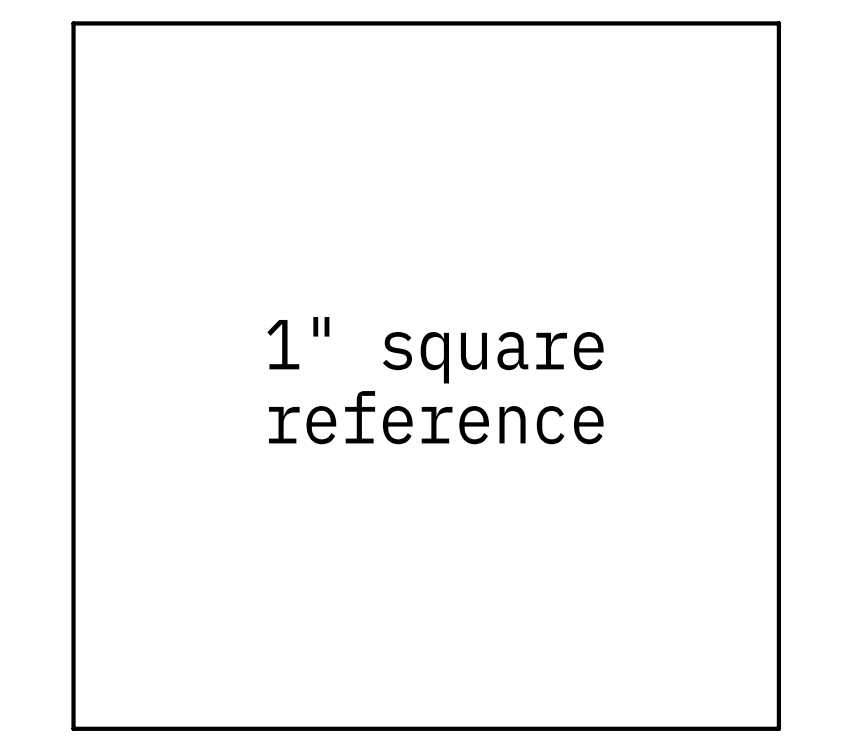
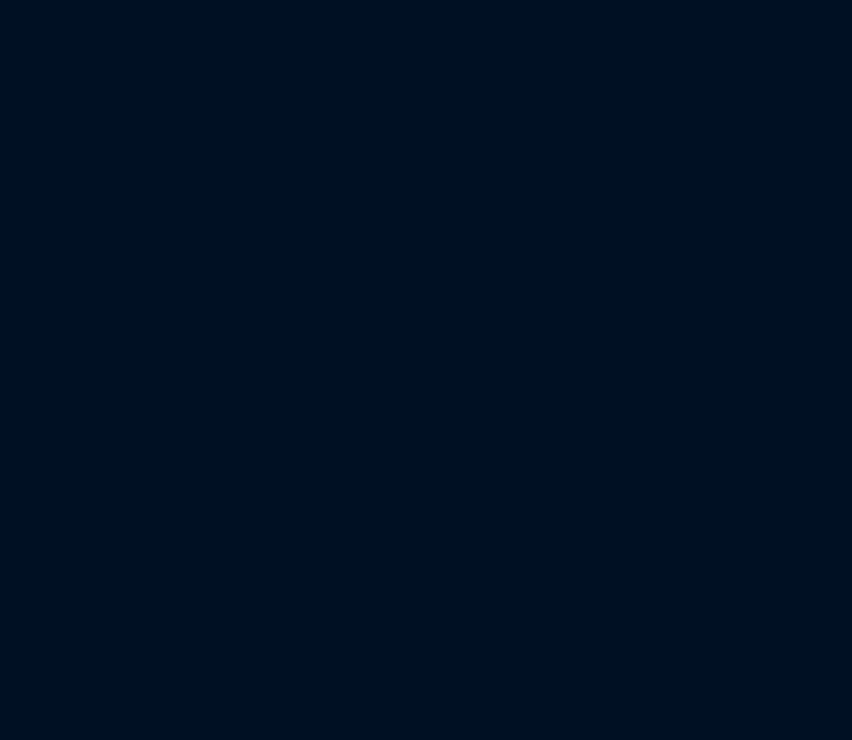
board edge: (73, 23) (73, 728) (778, 728) (778, 23) (73, 23) -> none
text: 1" square (435, 350) -> none
text: reference (436, 417) -> none

